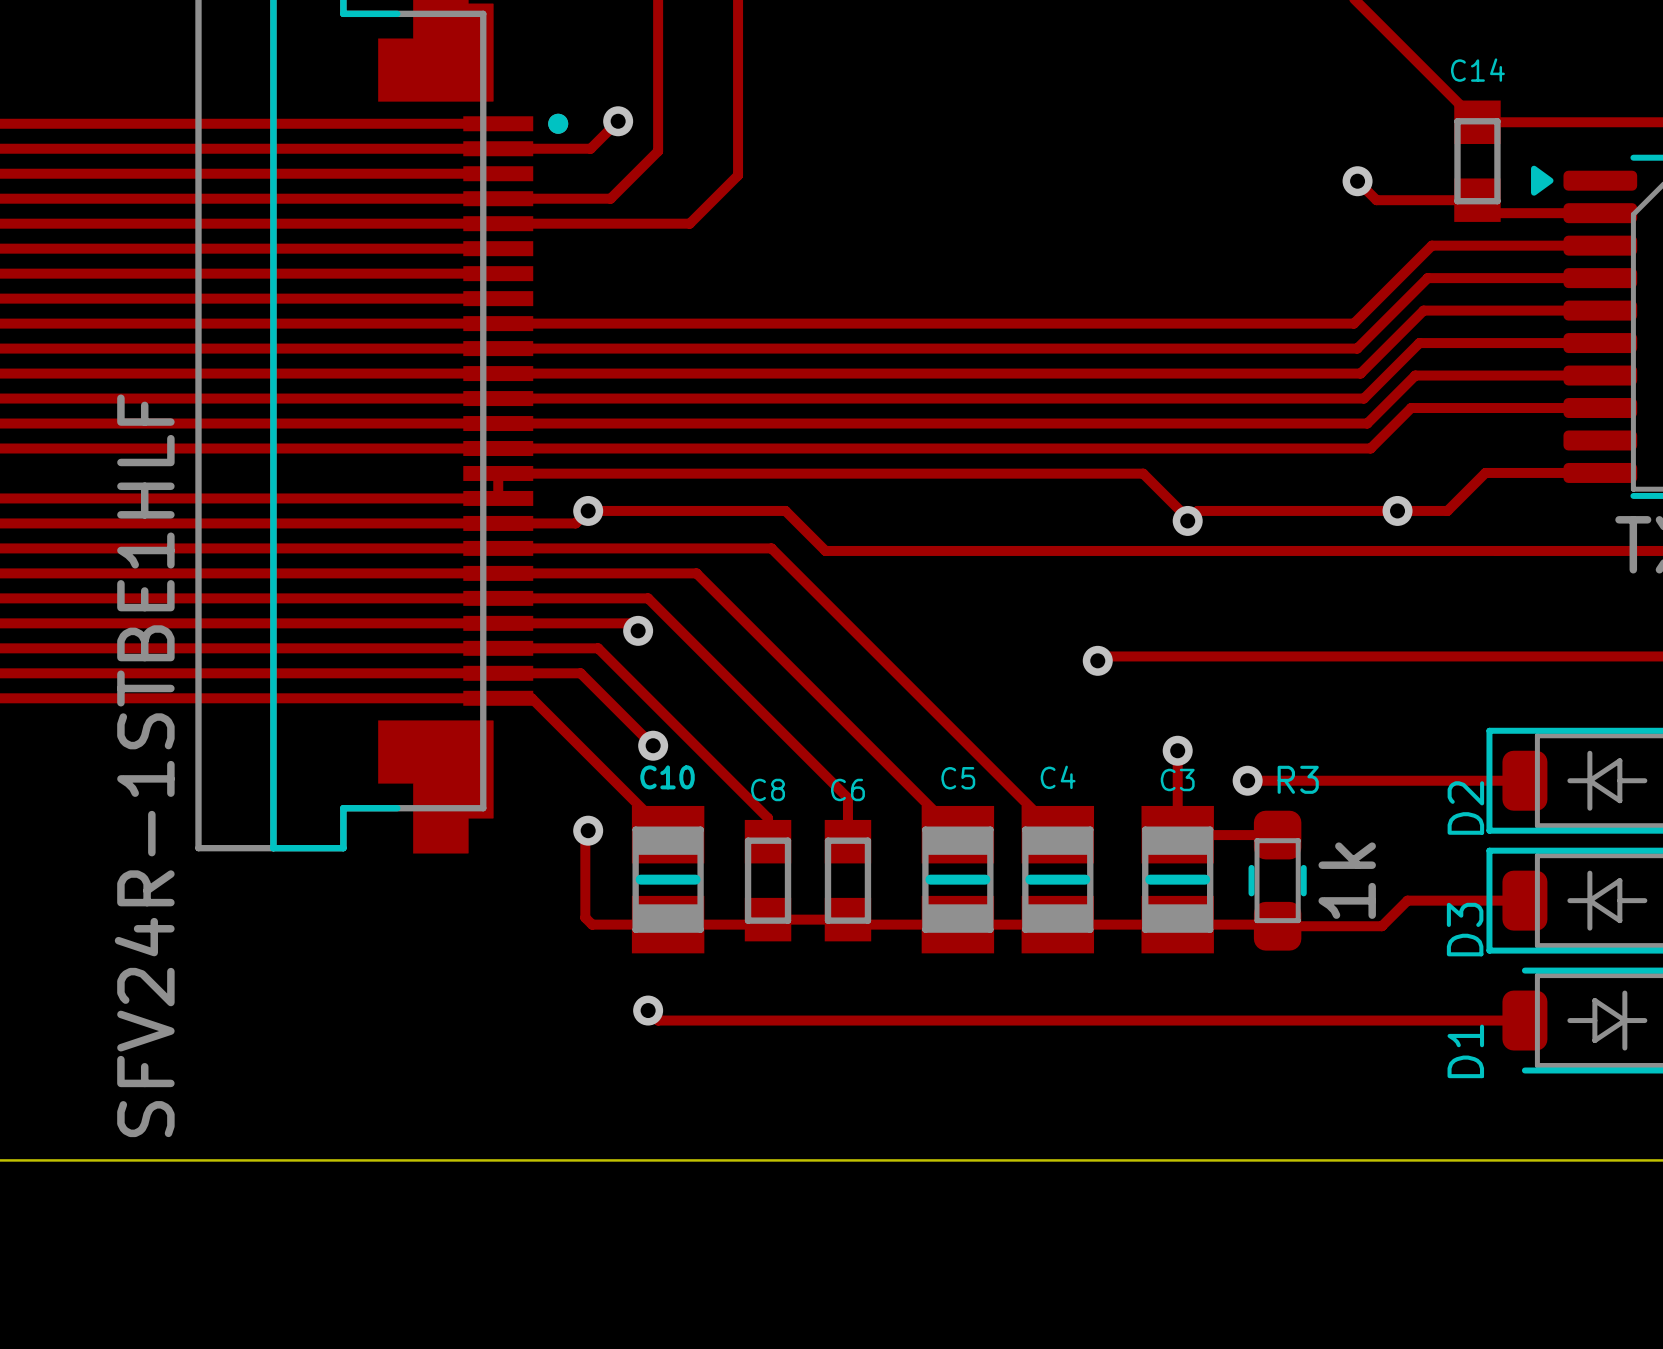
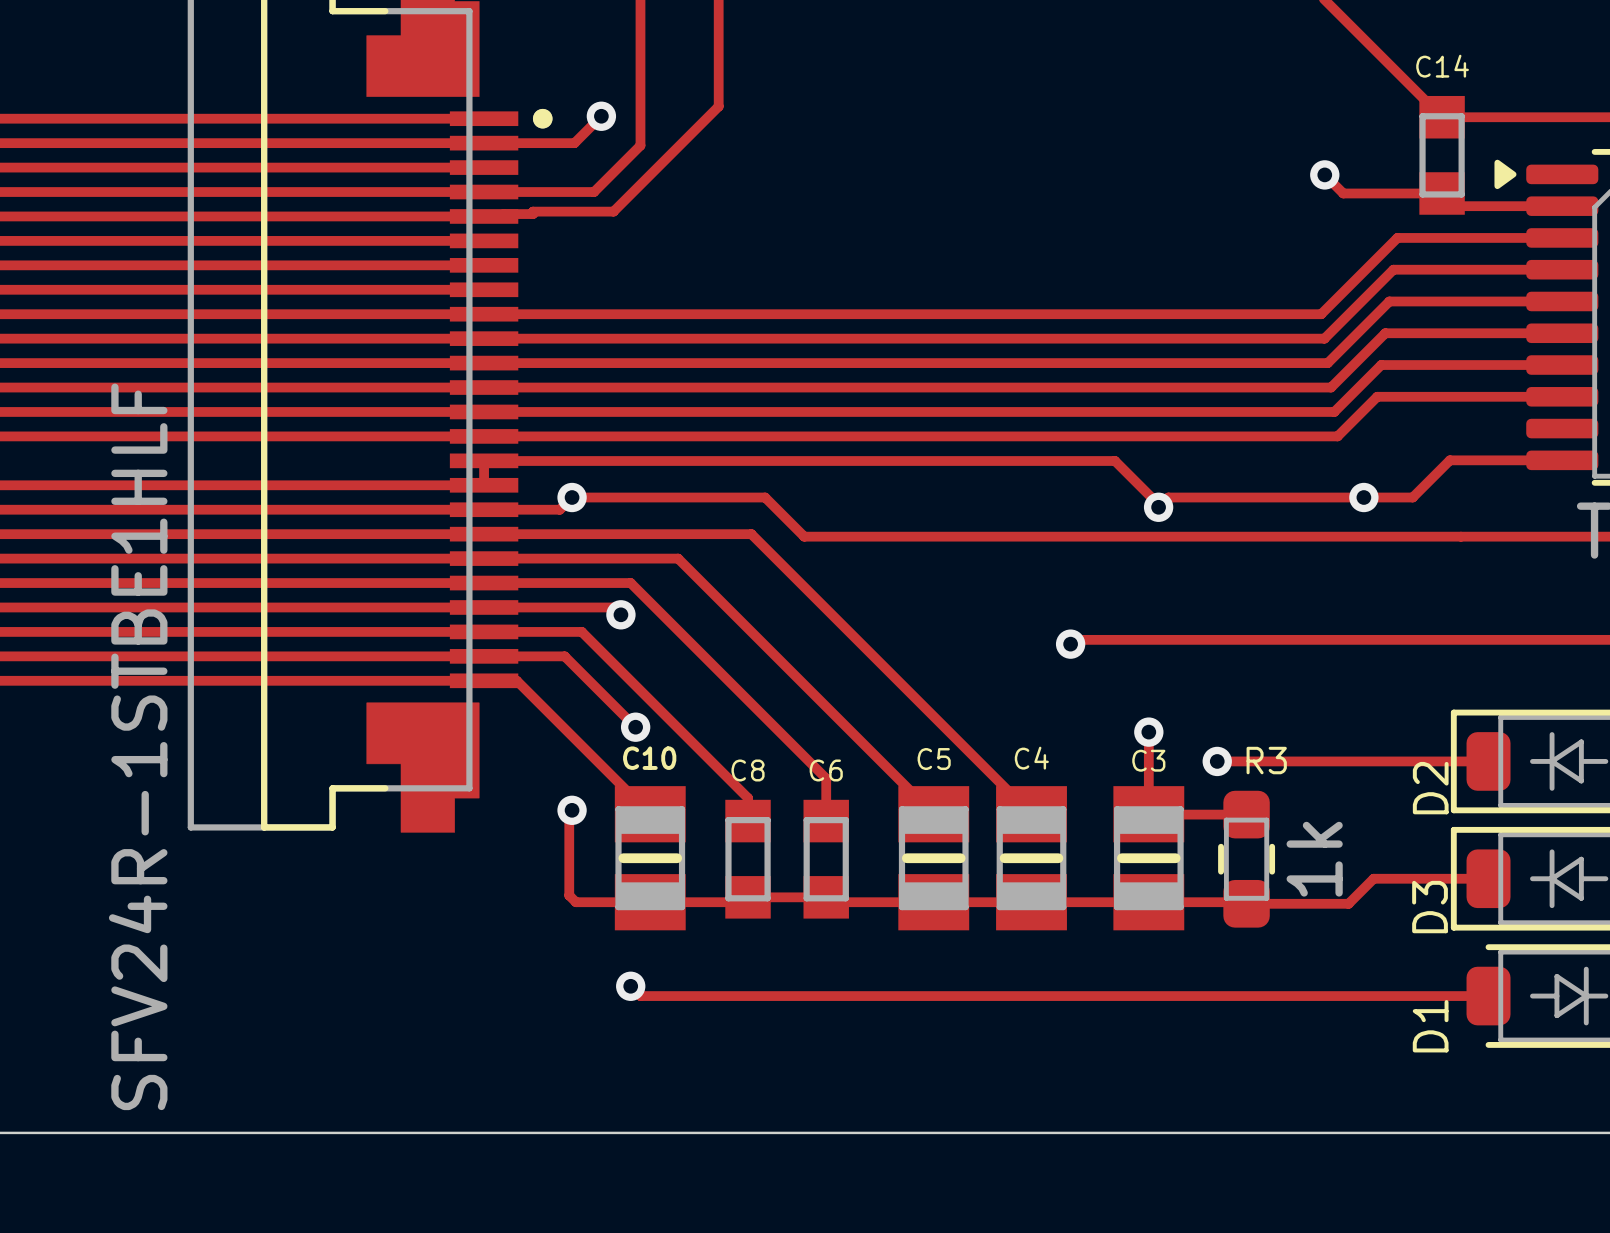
track: (738, 111) (738, 175) (689, 223) (515, 223) -> (718, 106) (613, 211) (533, 211) (533, 214) (503, 214) (501, 216)

